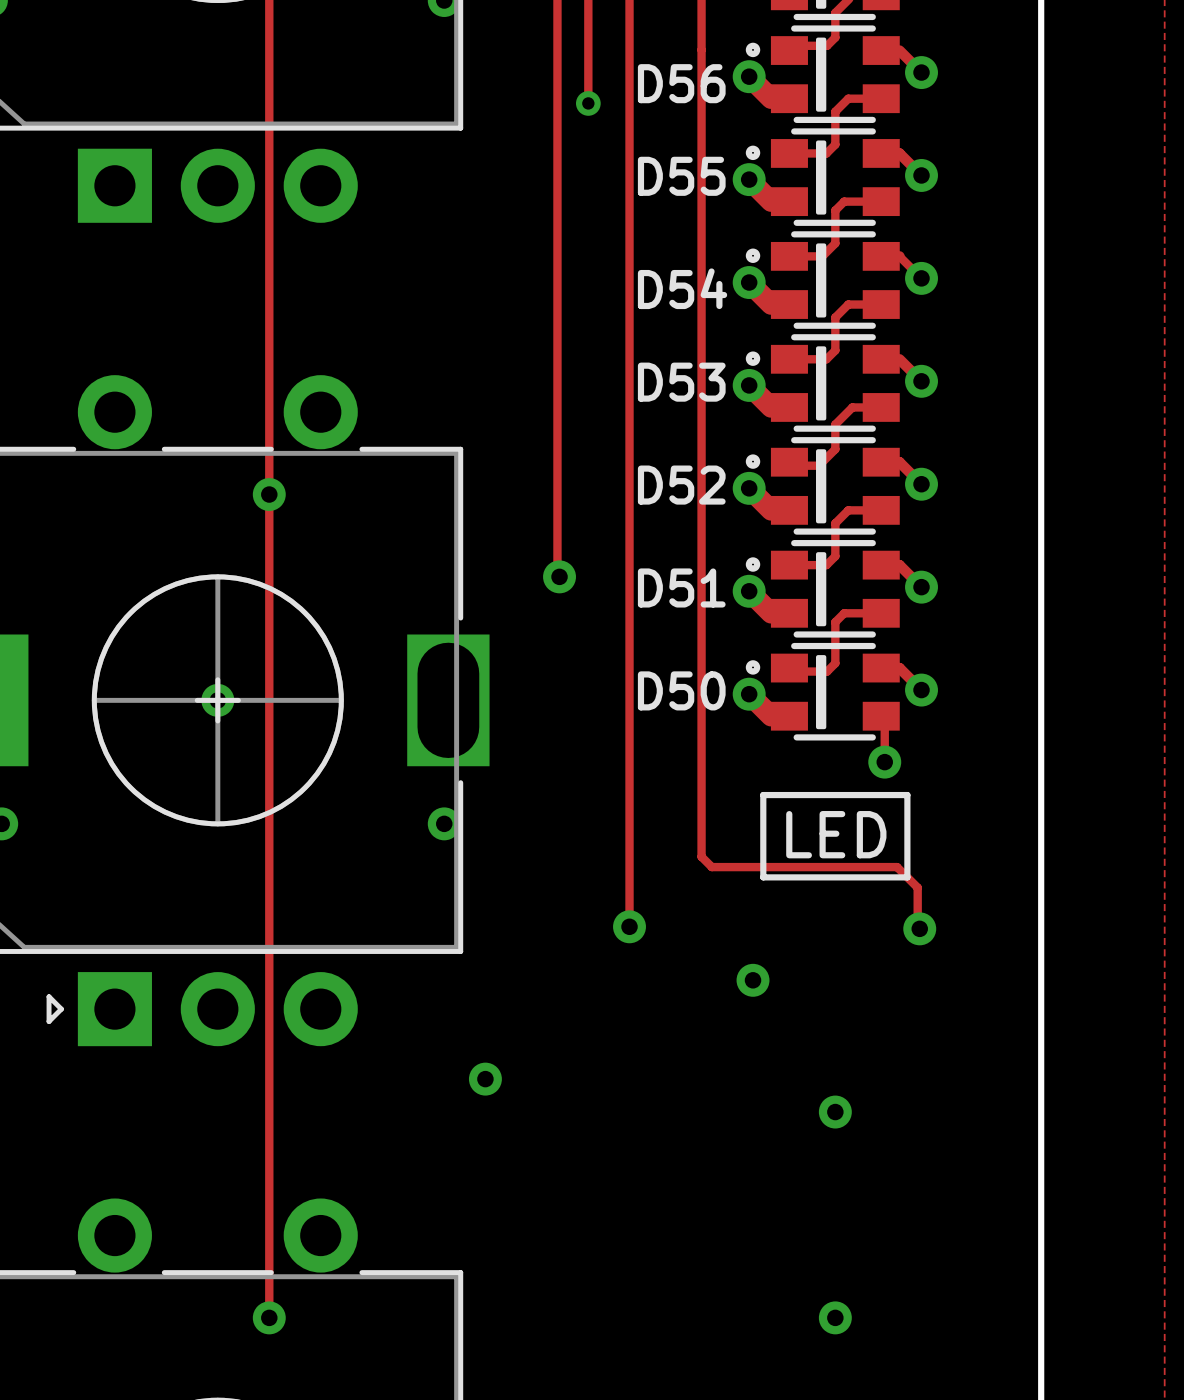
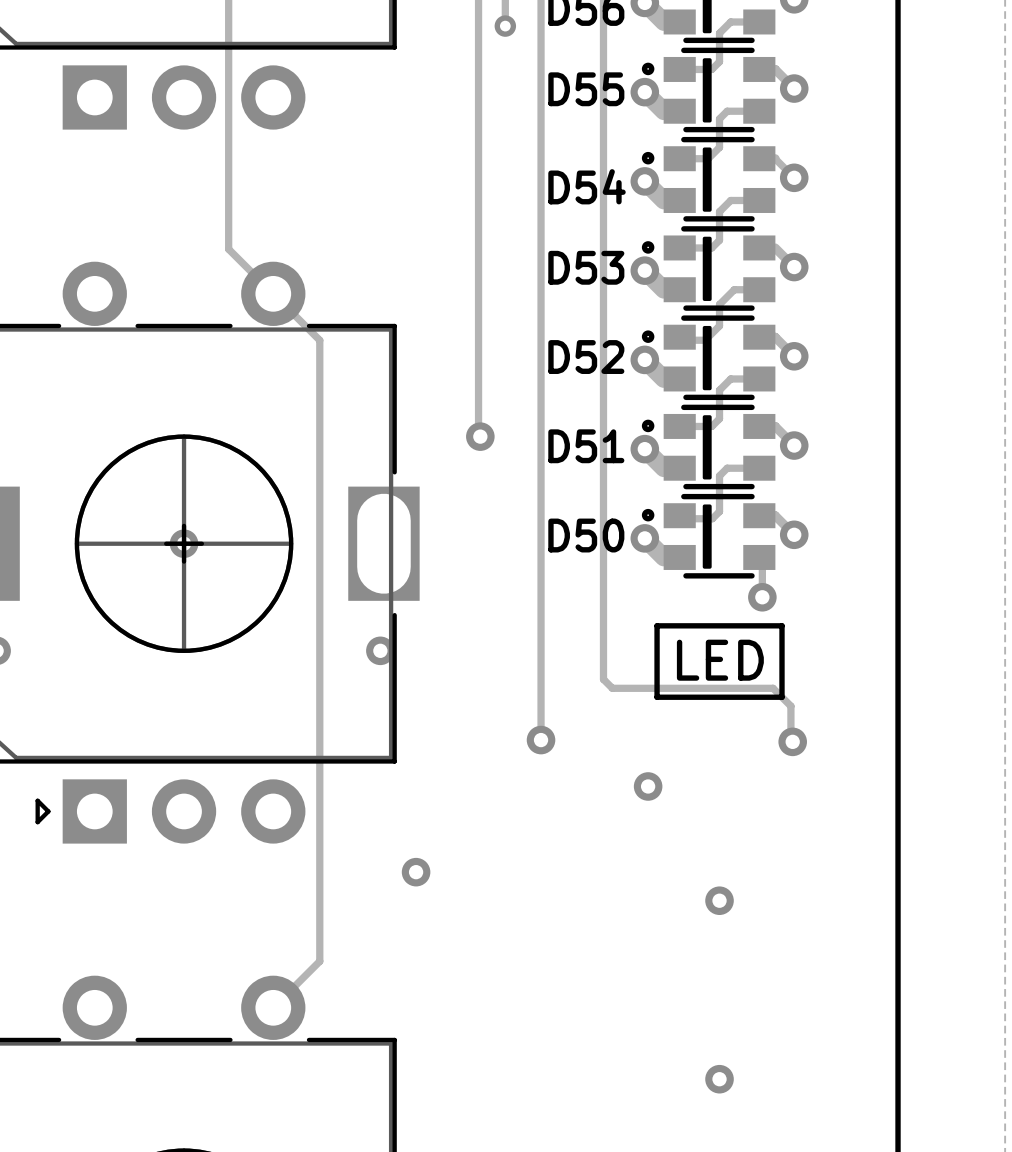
track: (269, 360) (269, 1317) -> (228, 249) (319, 340) (319, 961) (273, 1007)
via: (269, 494) -> none
via: (269, 1317) -> none

